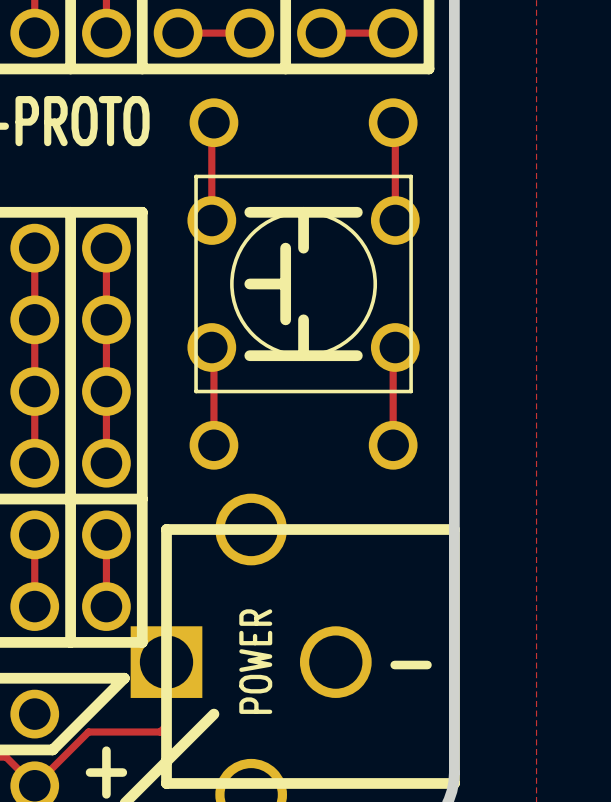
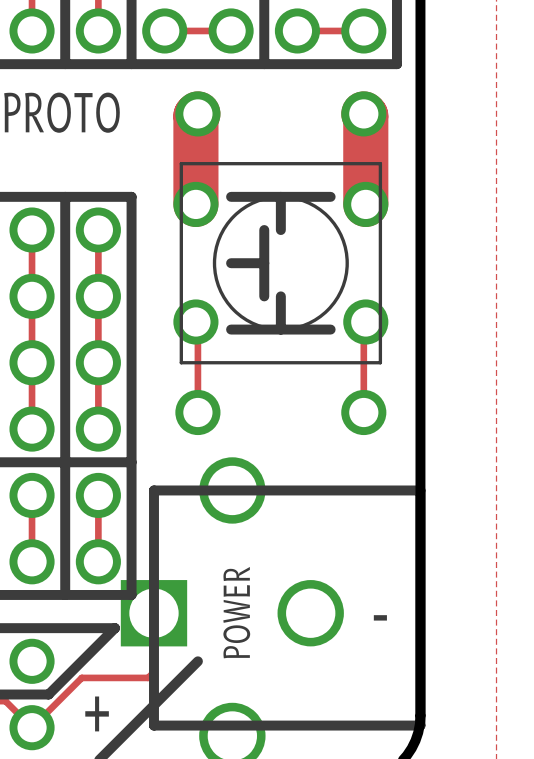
track width: thin (213, 122) (211, 124) (211, 220) -> thick (197, 113) (195, 115) (195, 204)
track width: thin (393, 122) (395, 124) (395, 220) -> thick (363, 113) (365, 115) (365, 204)

